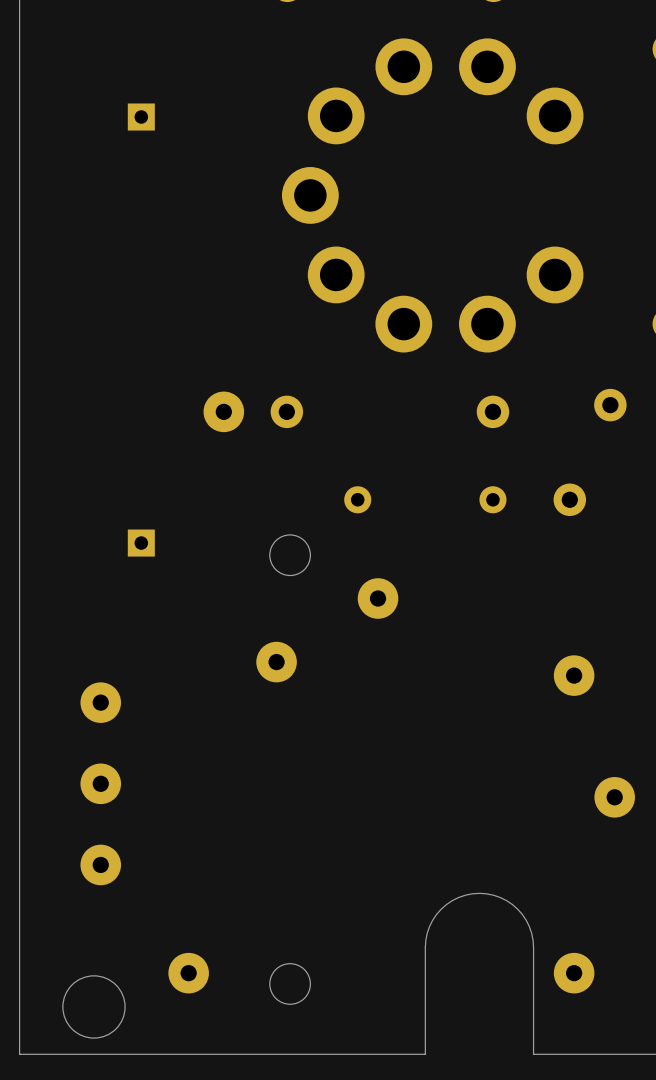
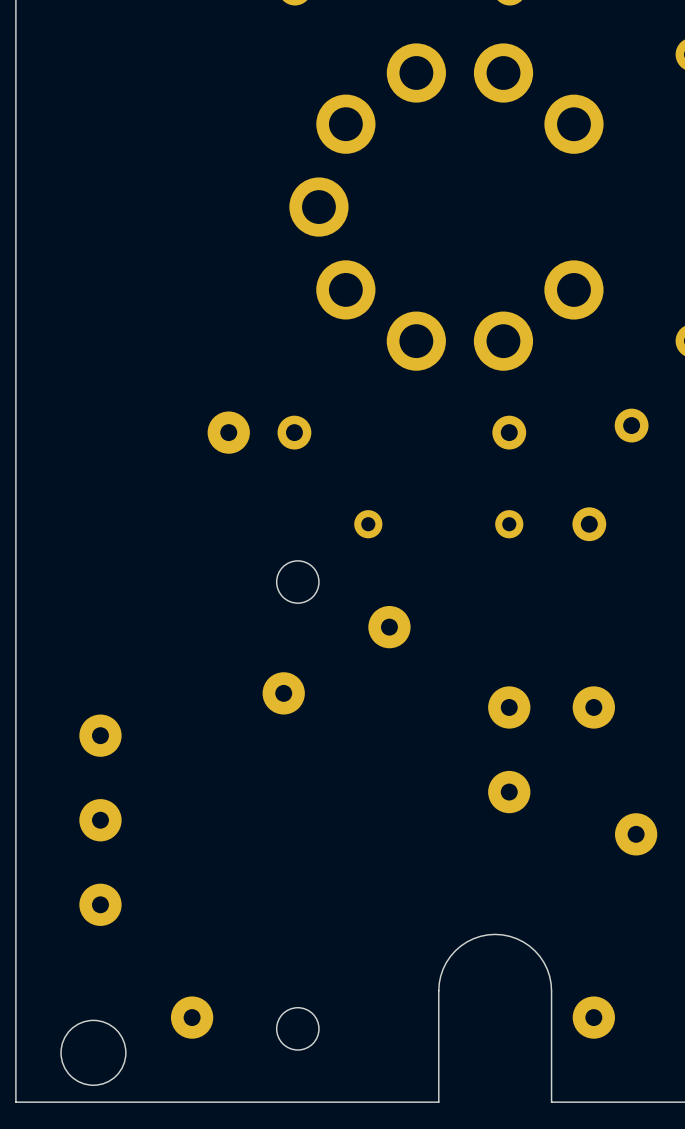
part: (141, 117) -> none
part: (141, 543) -> none
part: none -> (509, 707)
part: none -> (509, 792)

